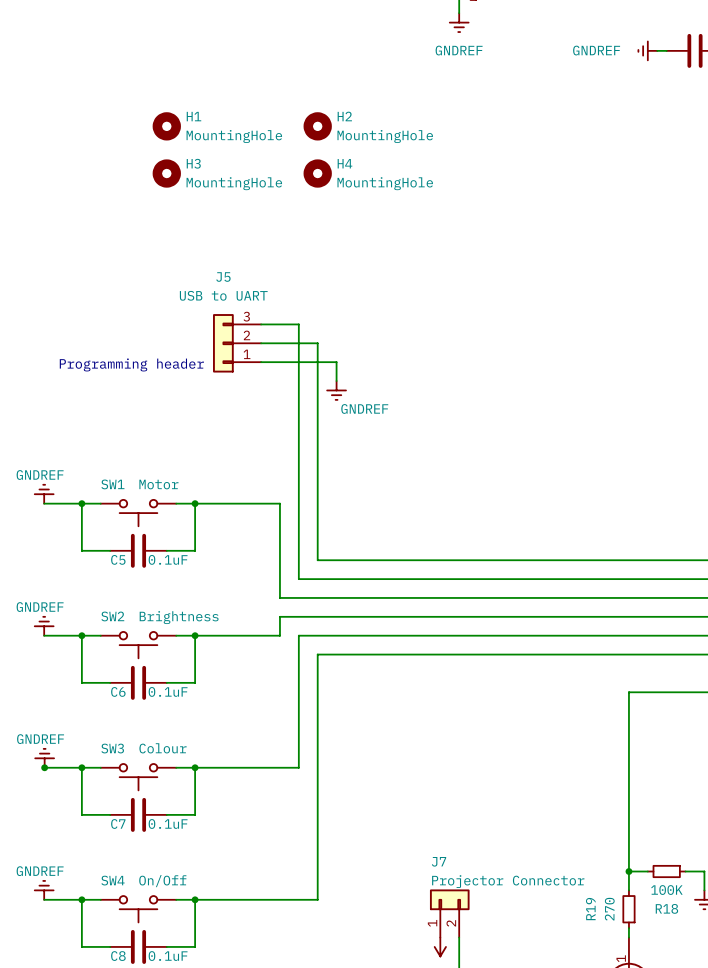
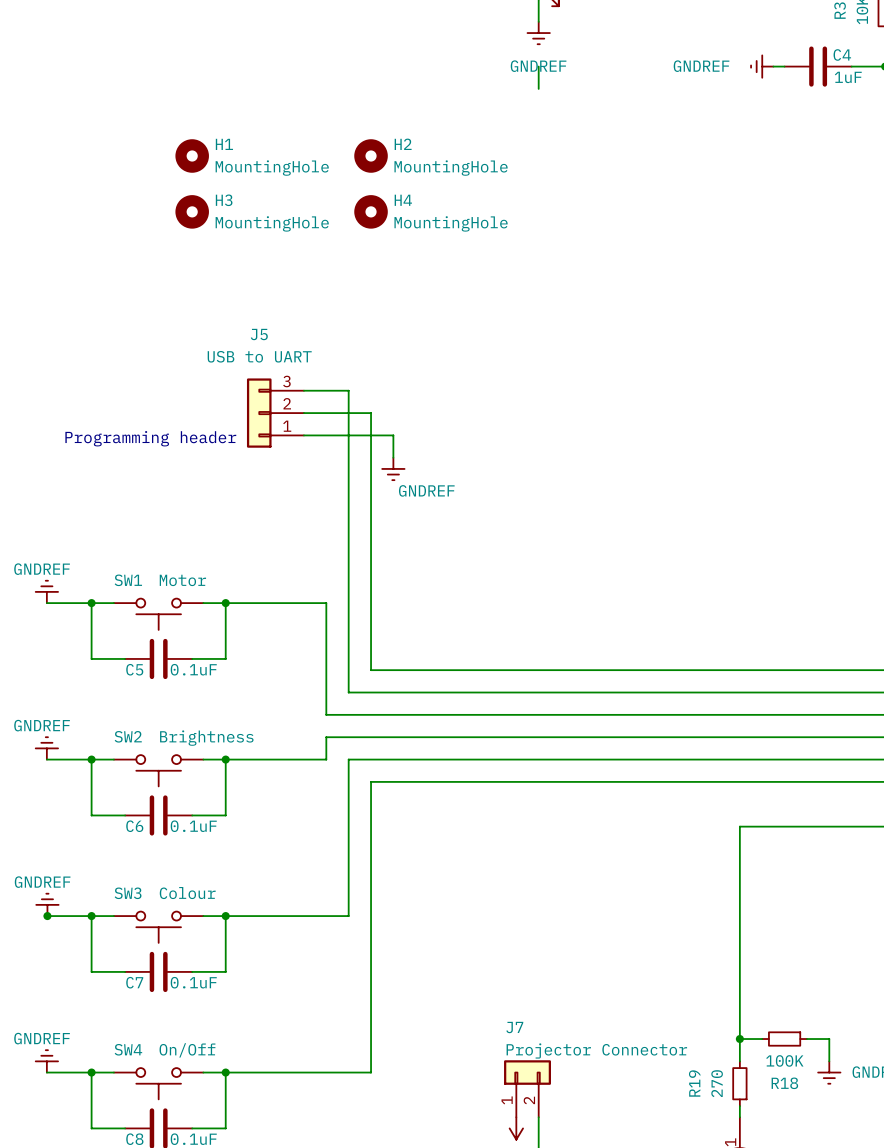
wire: none -> (538, 66) (538, 88)

